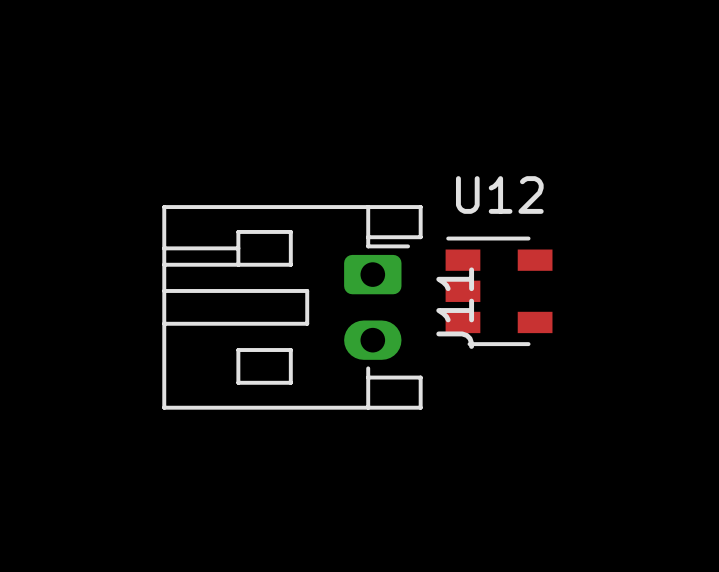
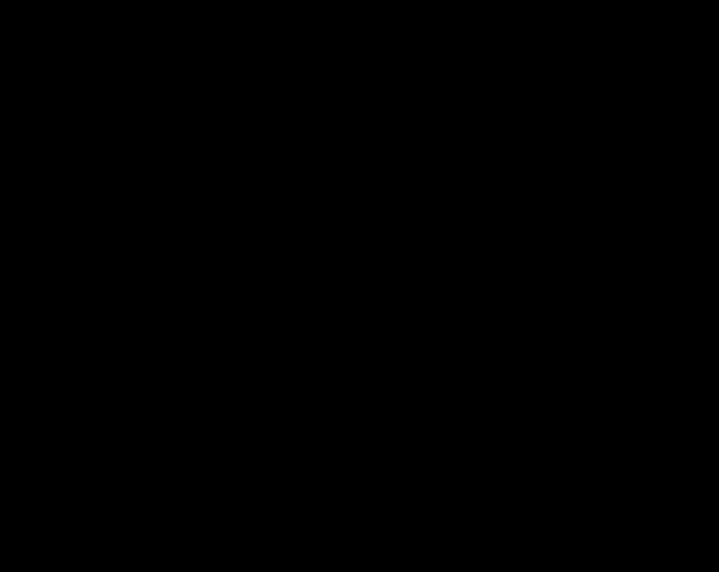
U12: (499, 291) -> none
J11: (292, 307) -> none

